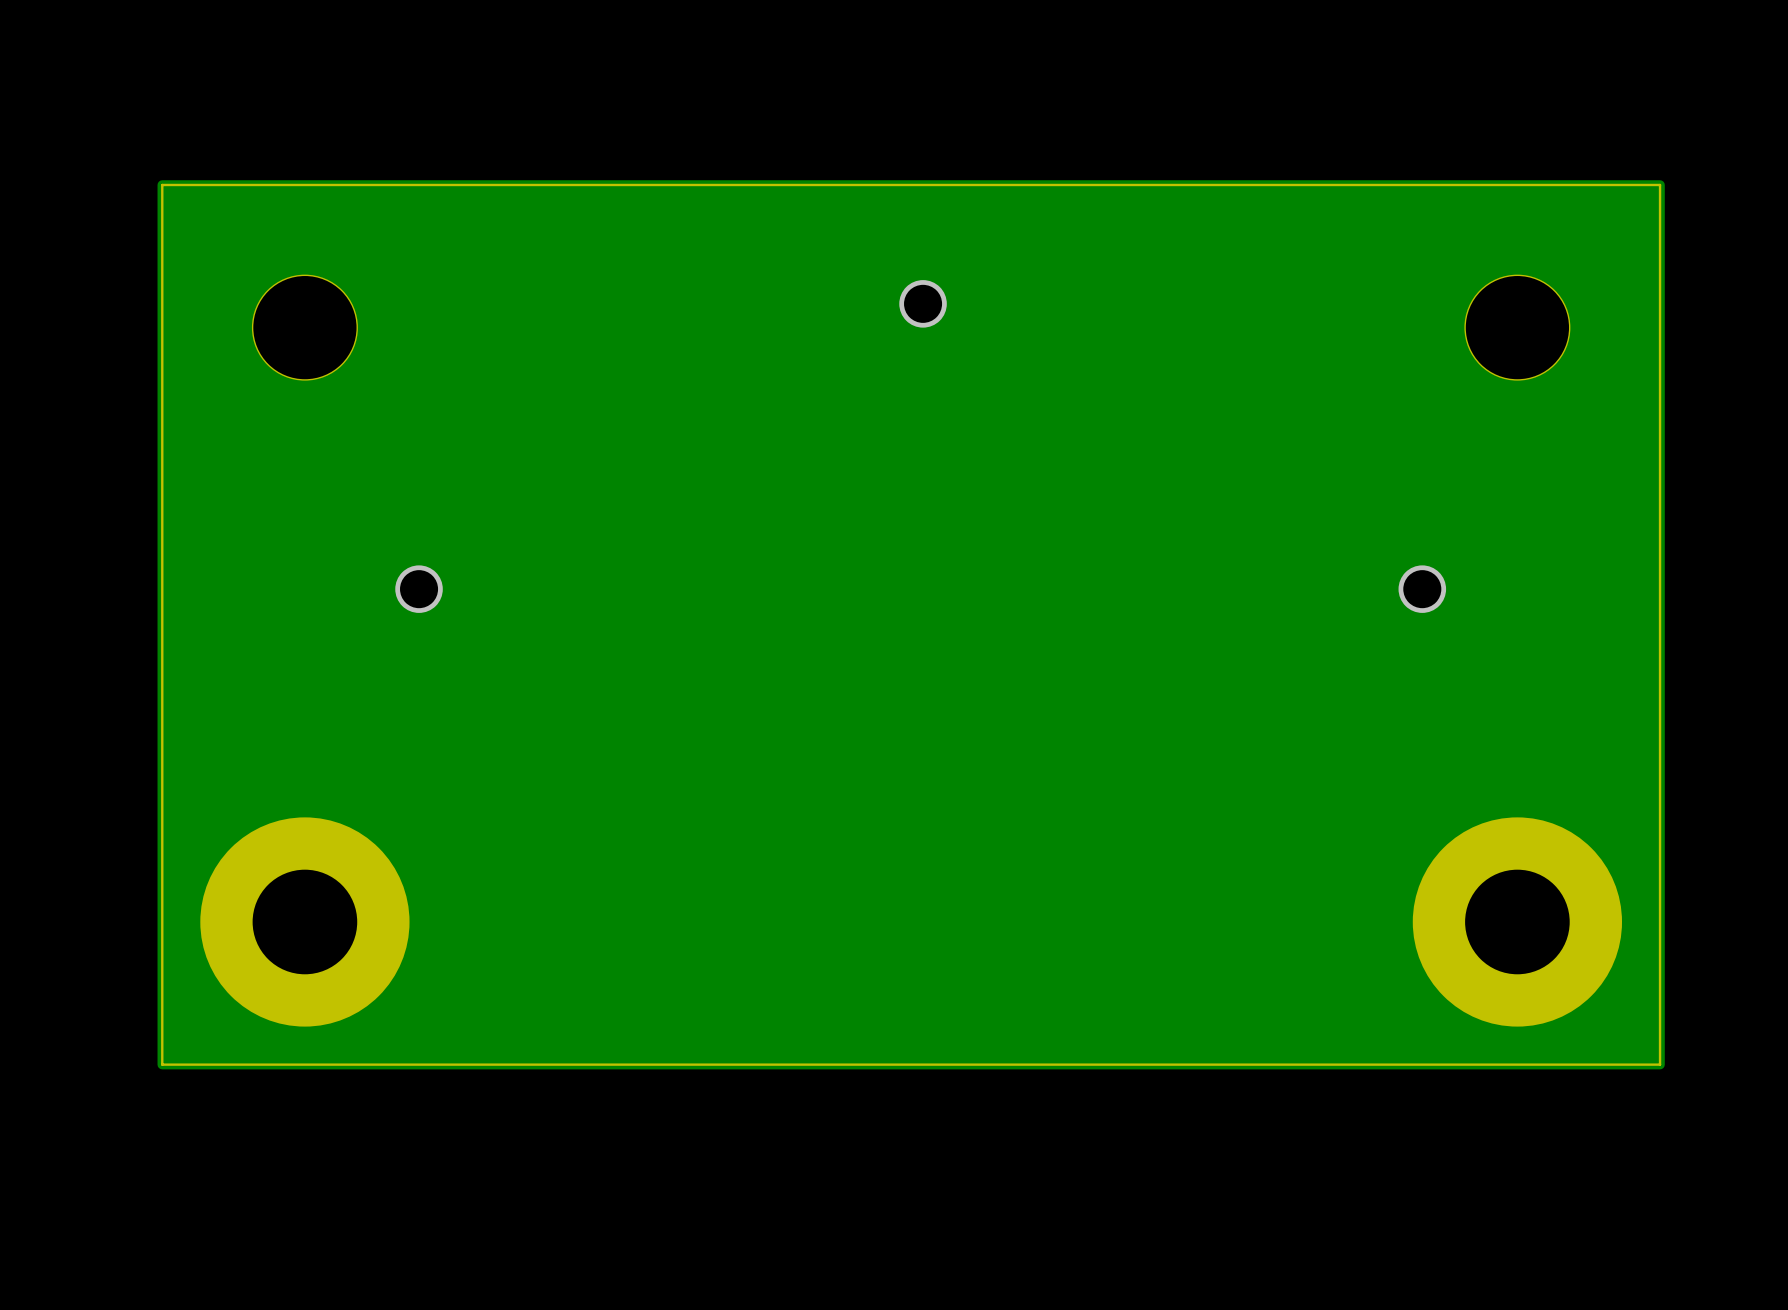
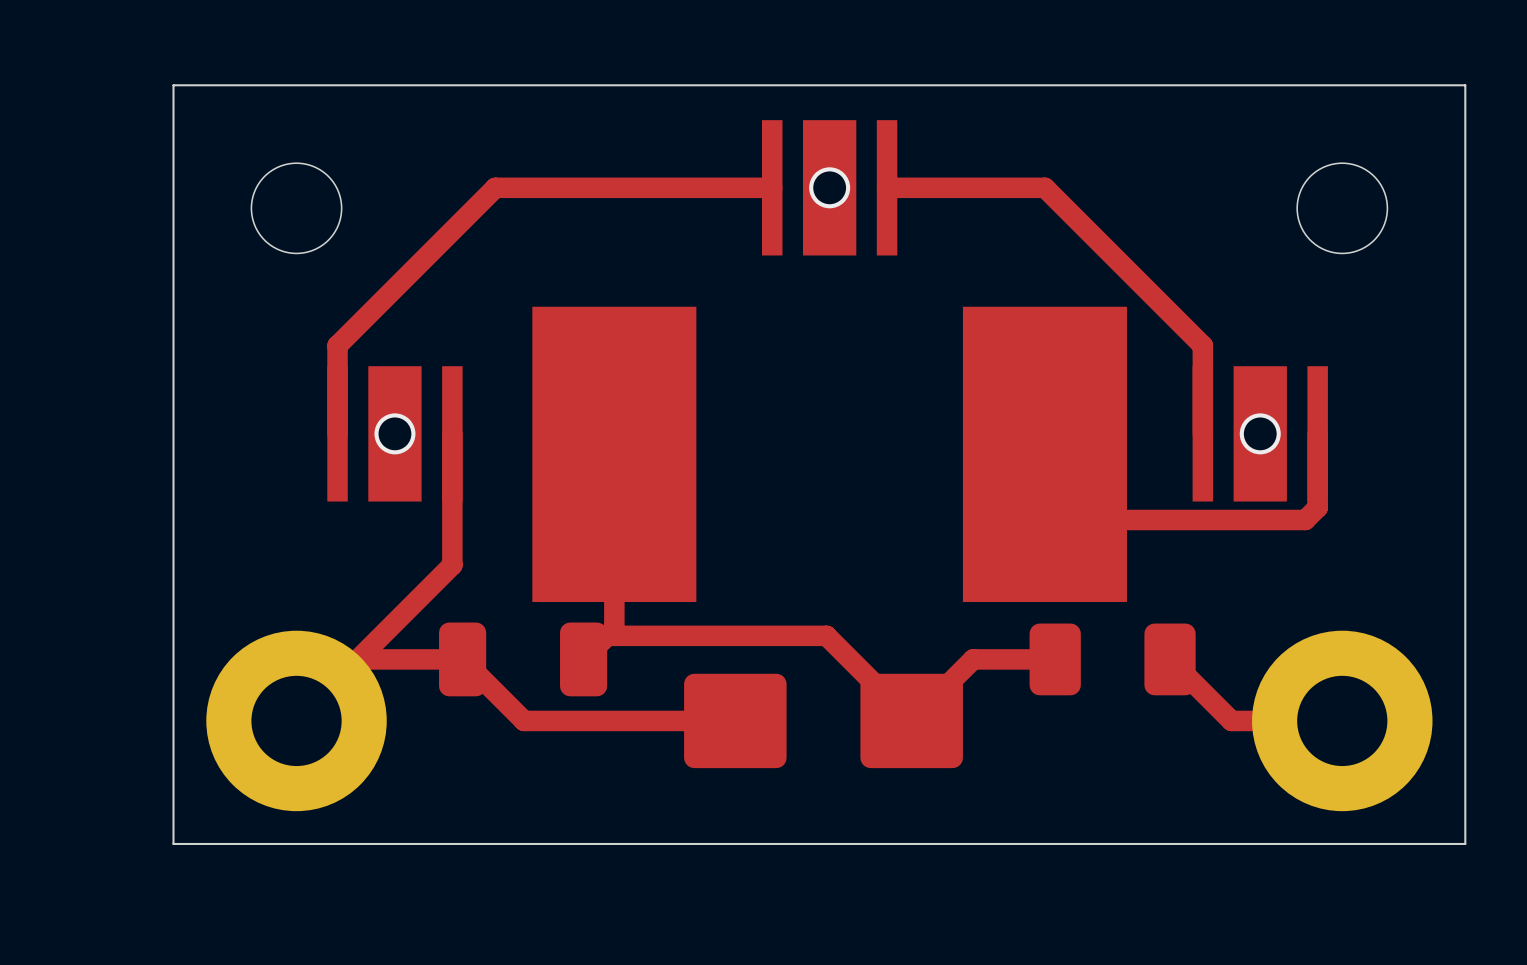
drawing: [157, 180, 1665, 1070] -> none

